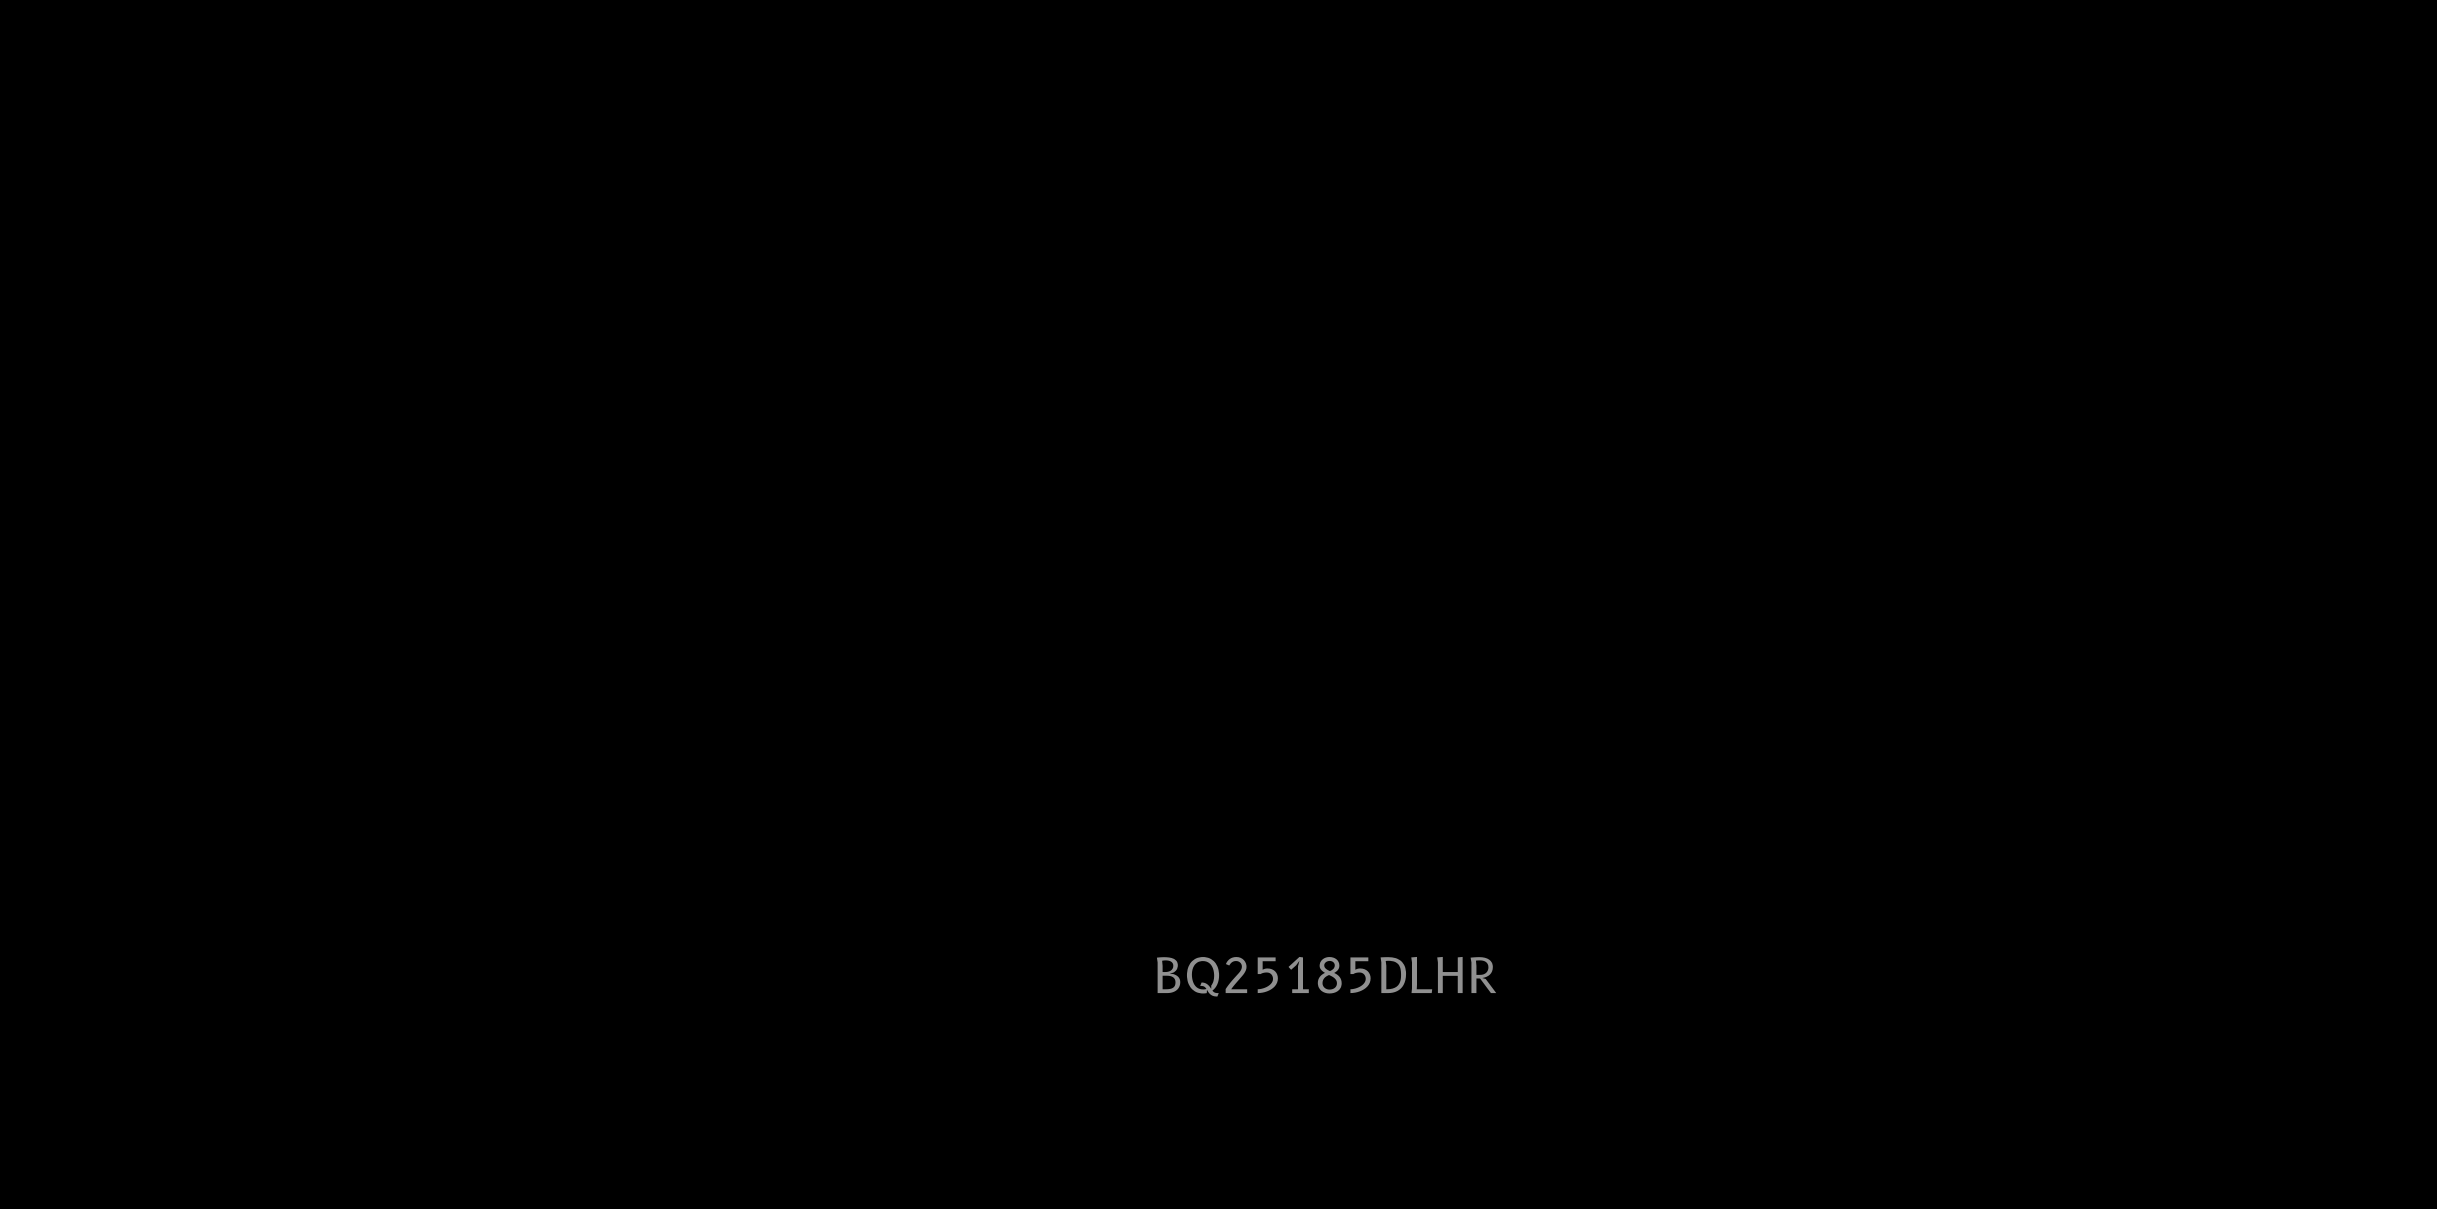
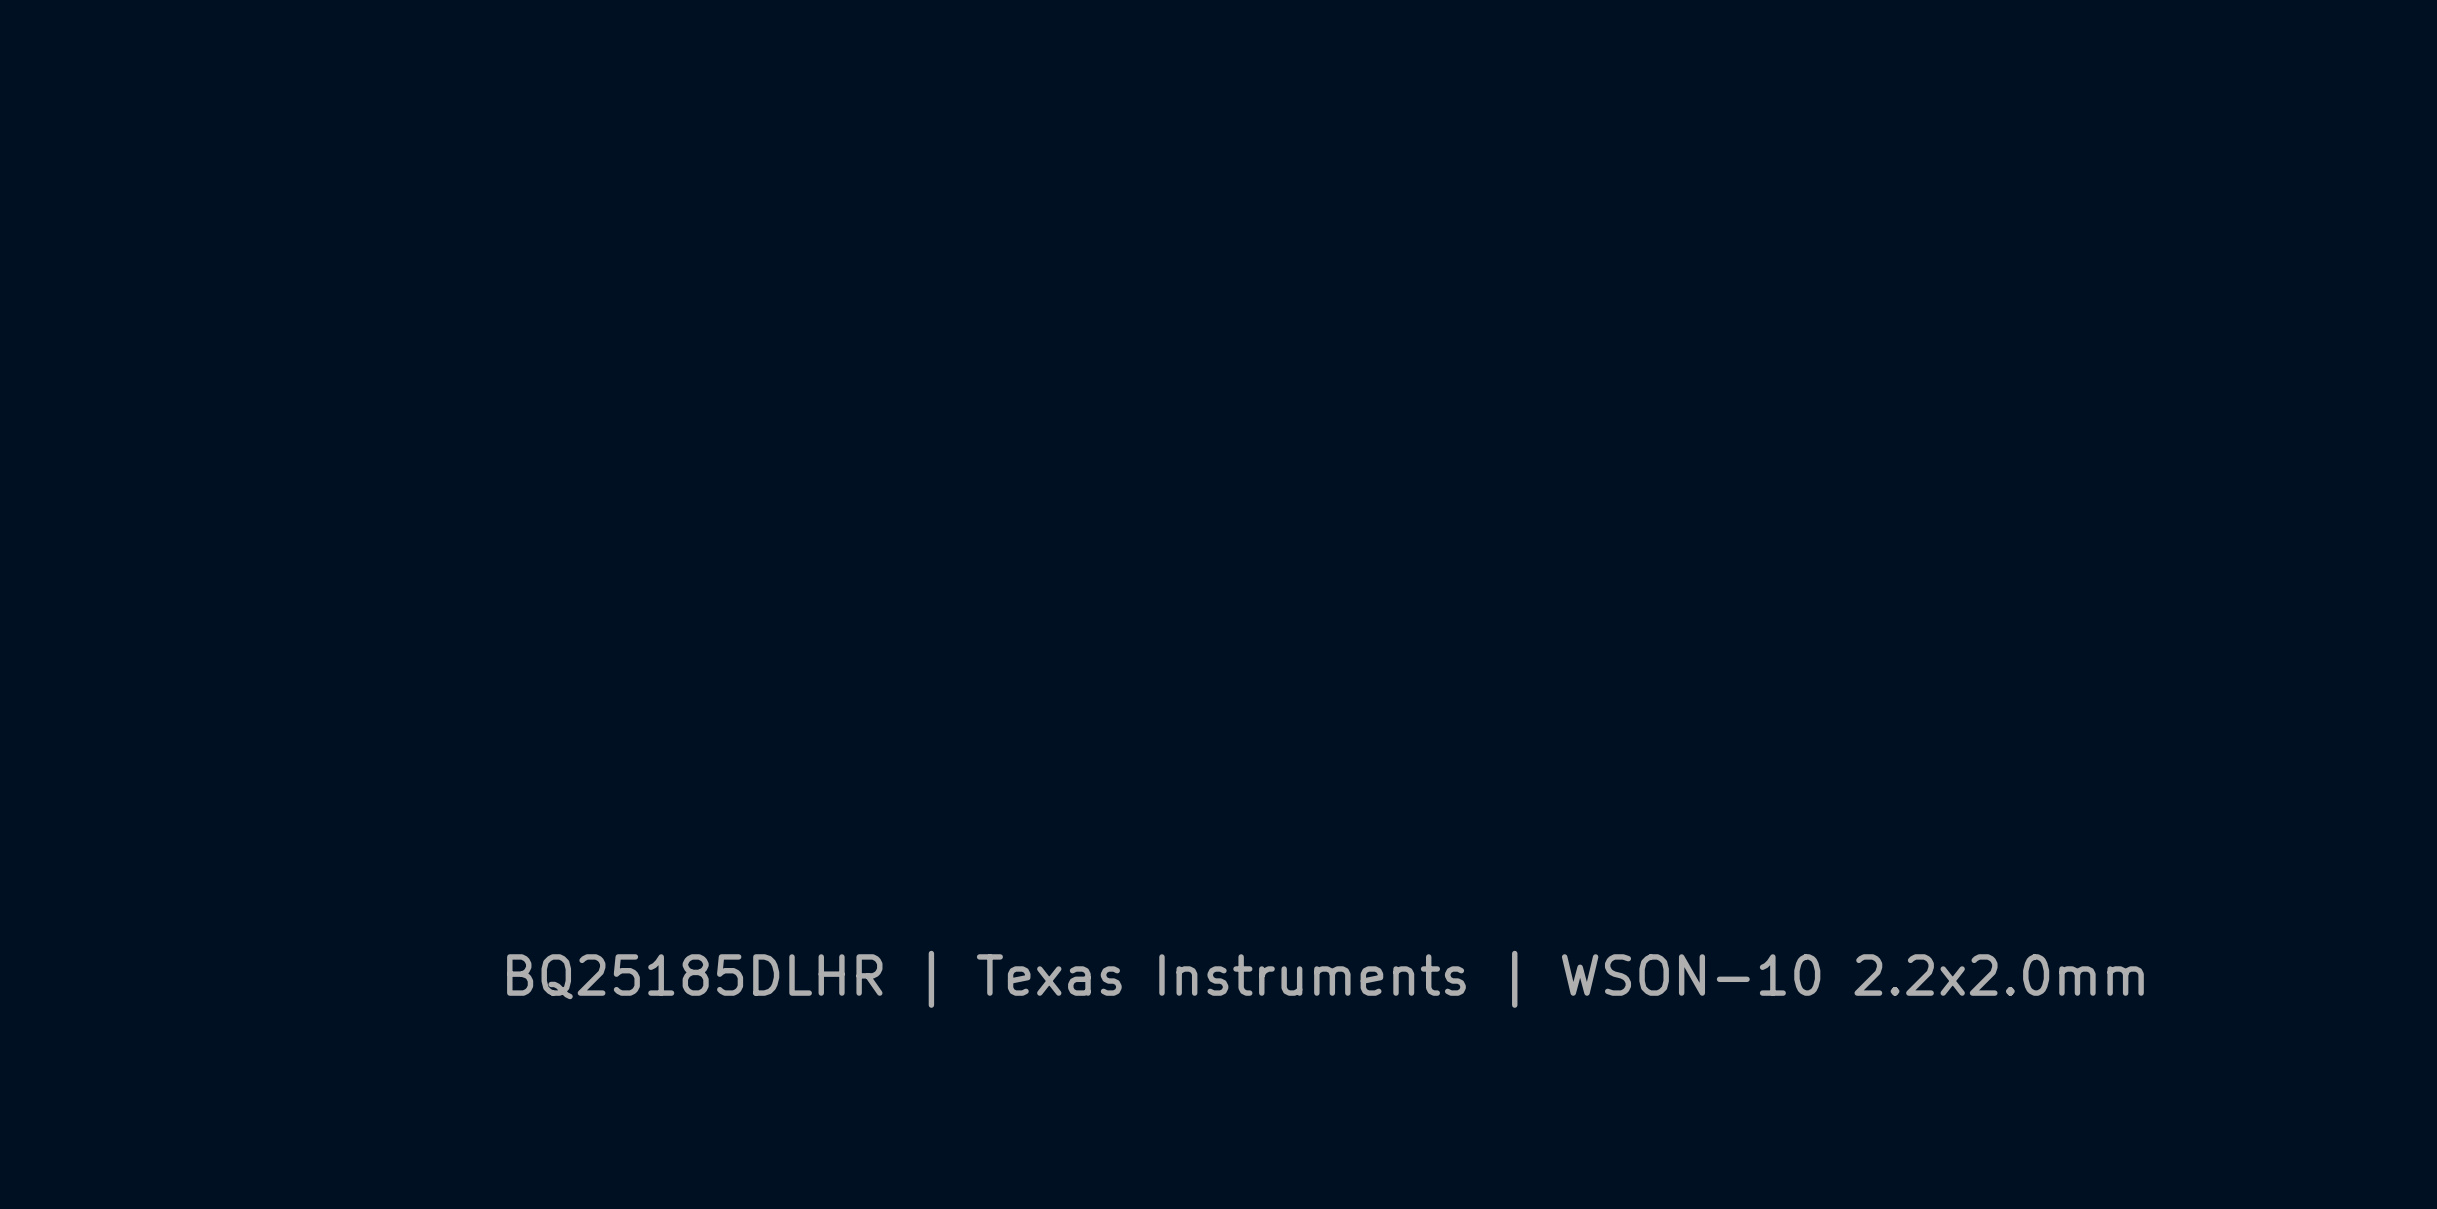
part value: BQ25185DLHR (1326, 976) -> BQ25185DLHR | Texas Instruments | WSON-10 2.2x2.0mm (1325, 979)

